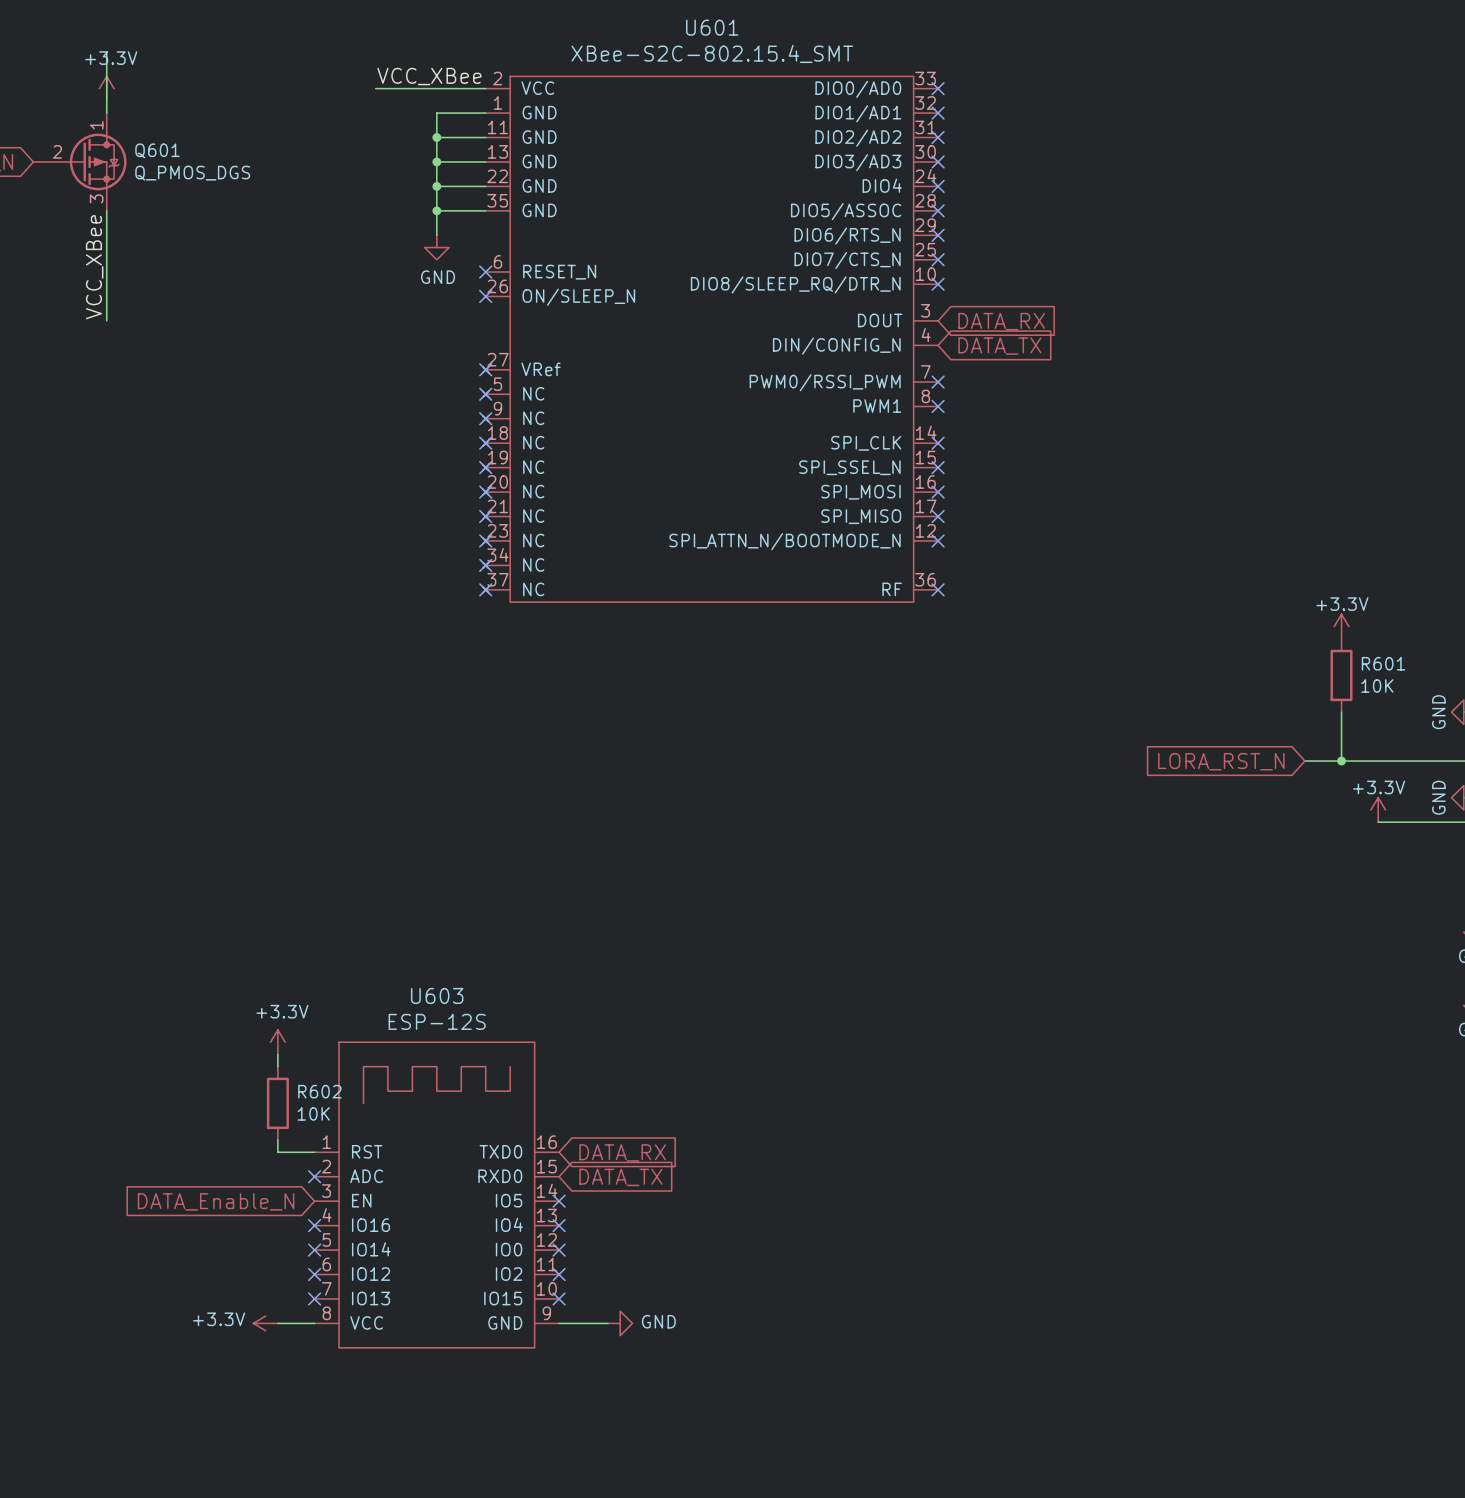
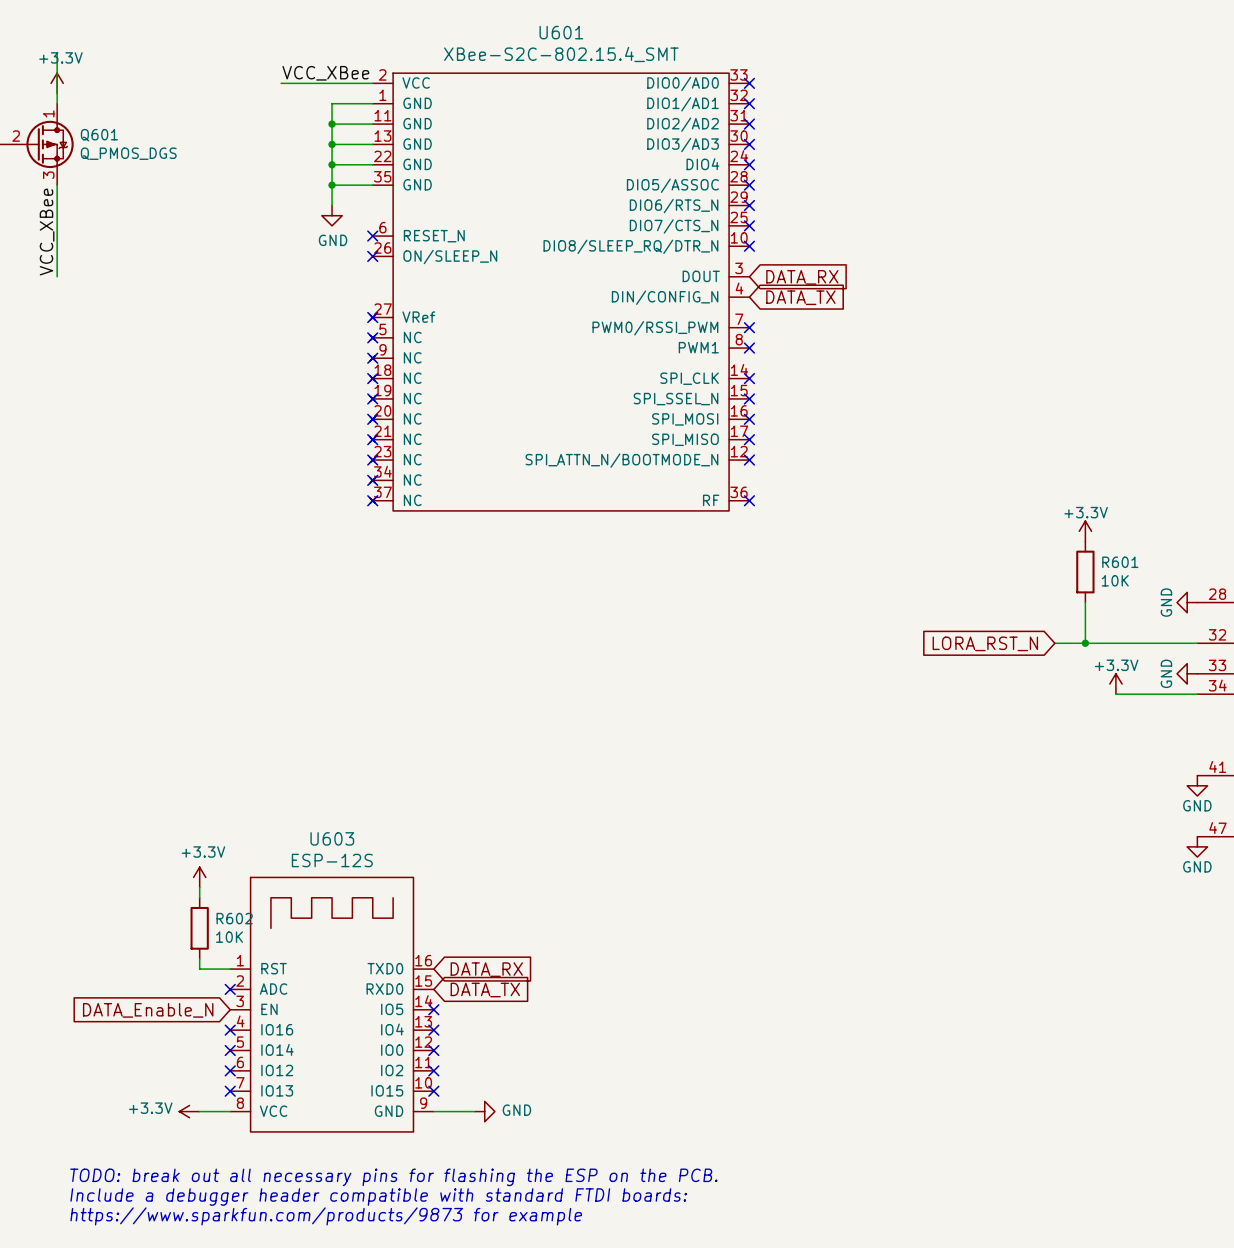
text: none -> TODO: break out all necessary pins for flashing the ESP on the PCB. (393, 1177)
text: none -> Include a debugger header compatible with standard FTDI boards: (378, 1197)
text: none -> https://www.sparkfun.com/products/9873 for example (326, 1216)

